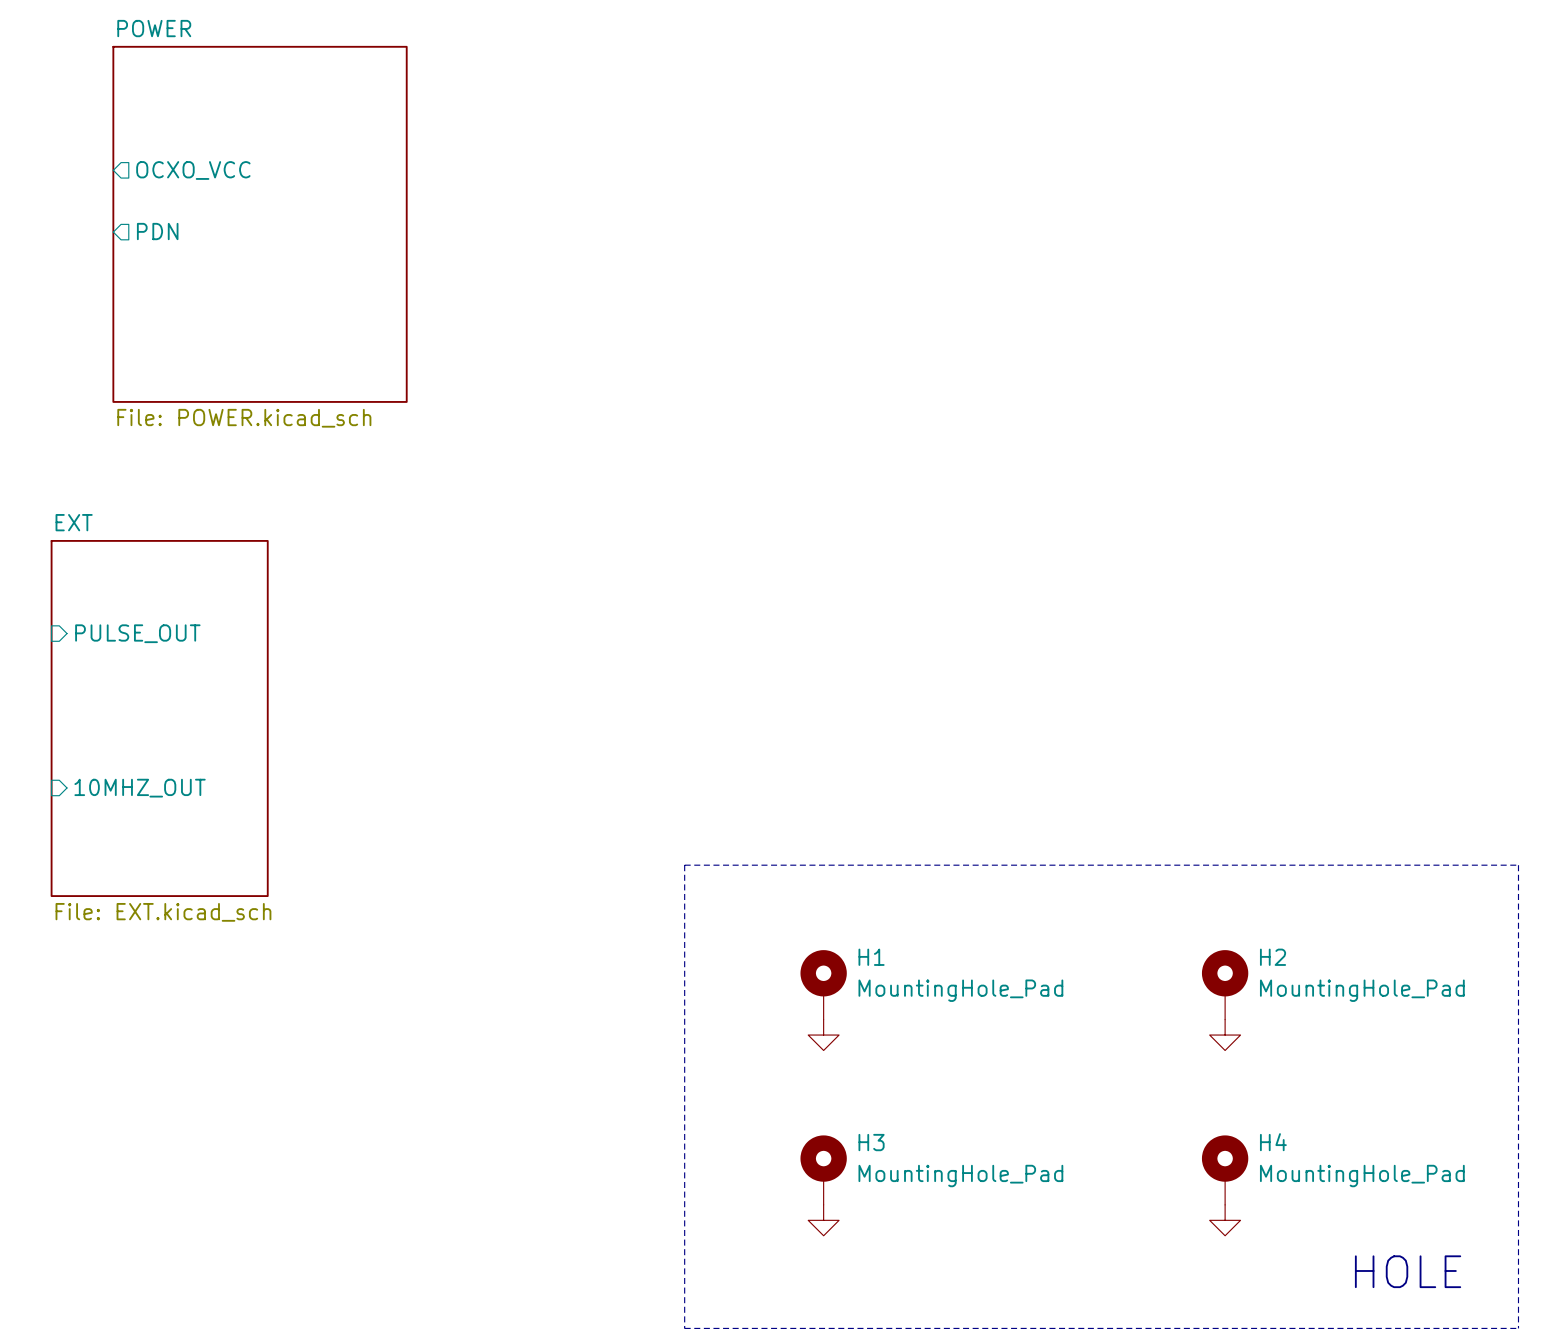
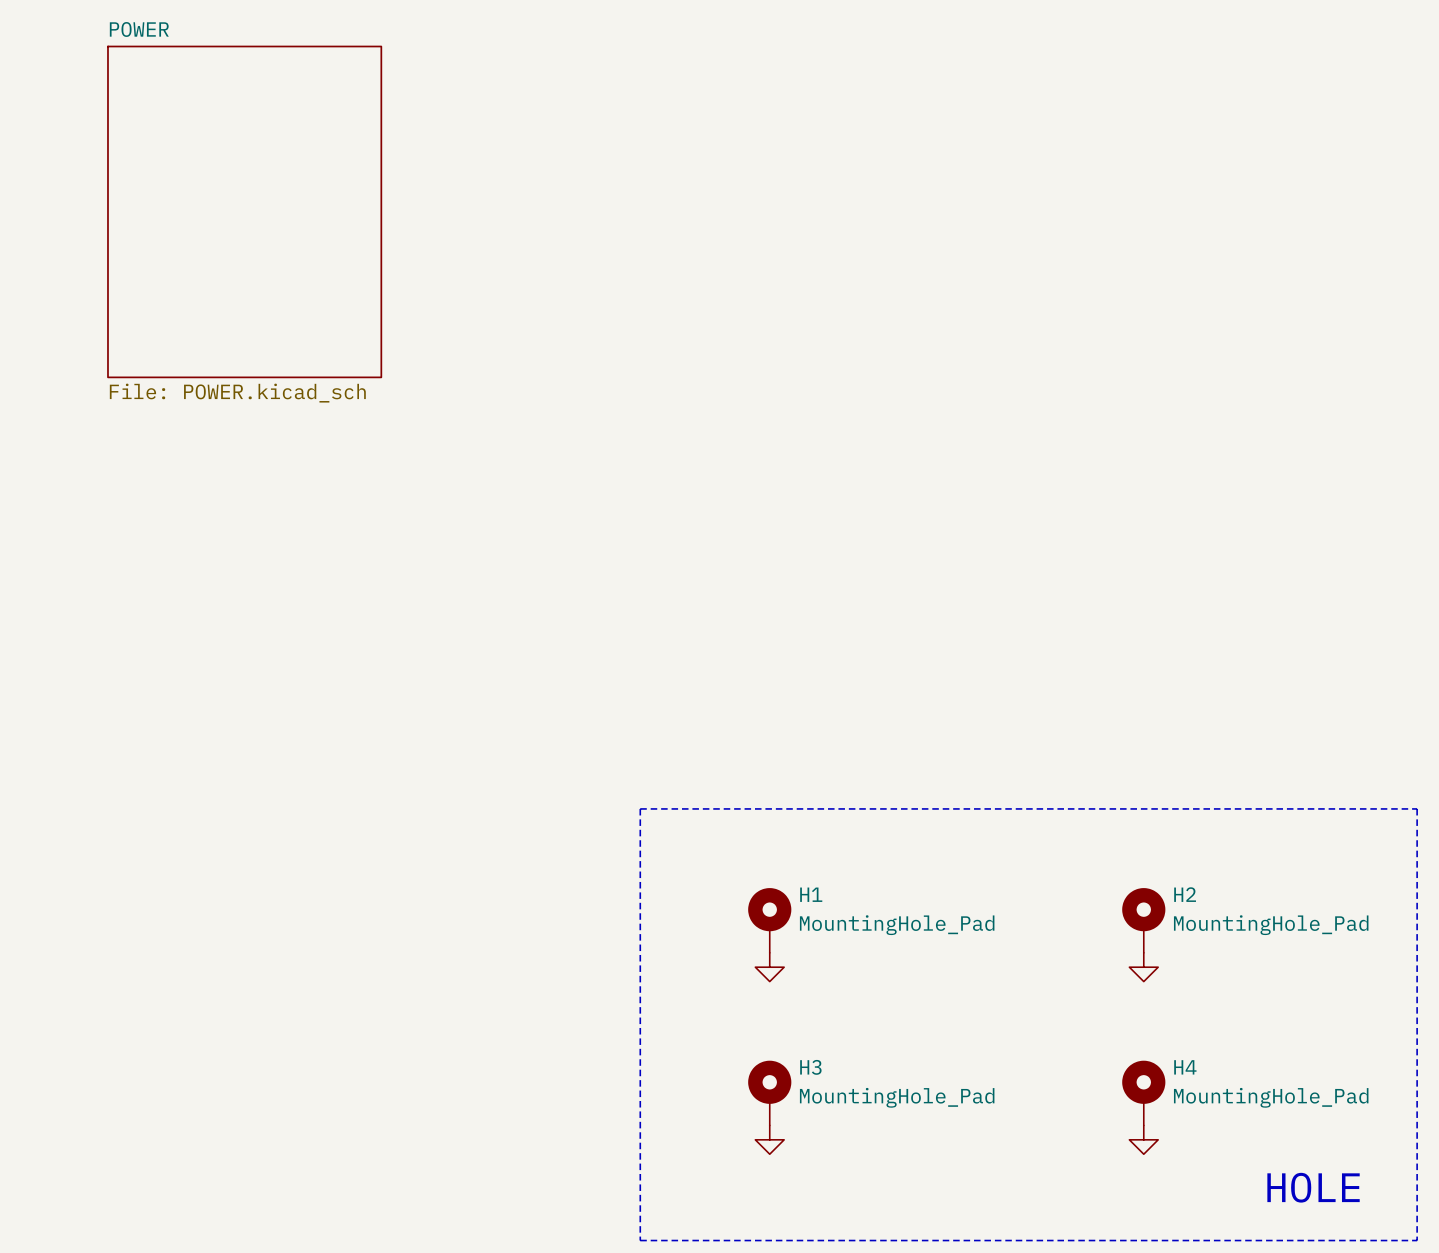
sheet pin: OCXO_VCC (193, 170) -> none
sheet pin: PDN (157, 231) -> none
sheet pin: PULSE_OUT (137, 633) -> none
sheet EXT: File: EXT.kicad_sch (159, 718) -> none
sheet pin: 10MHZ_OUT (140, 788) -> none

